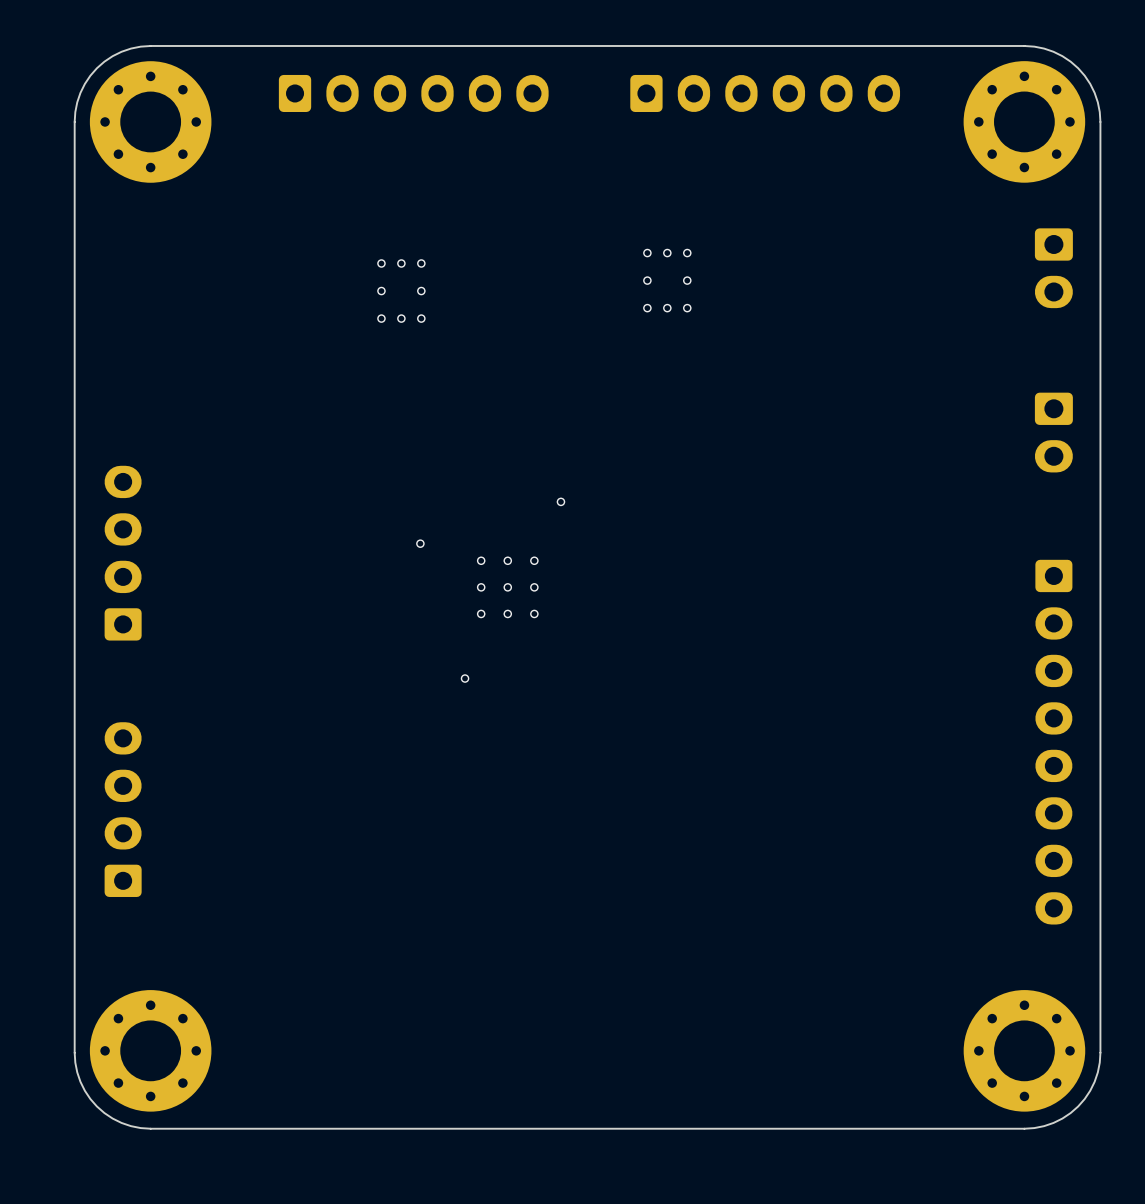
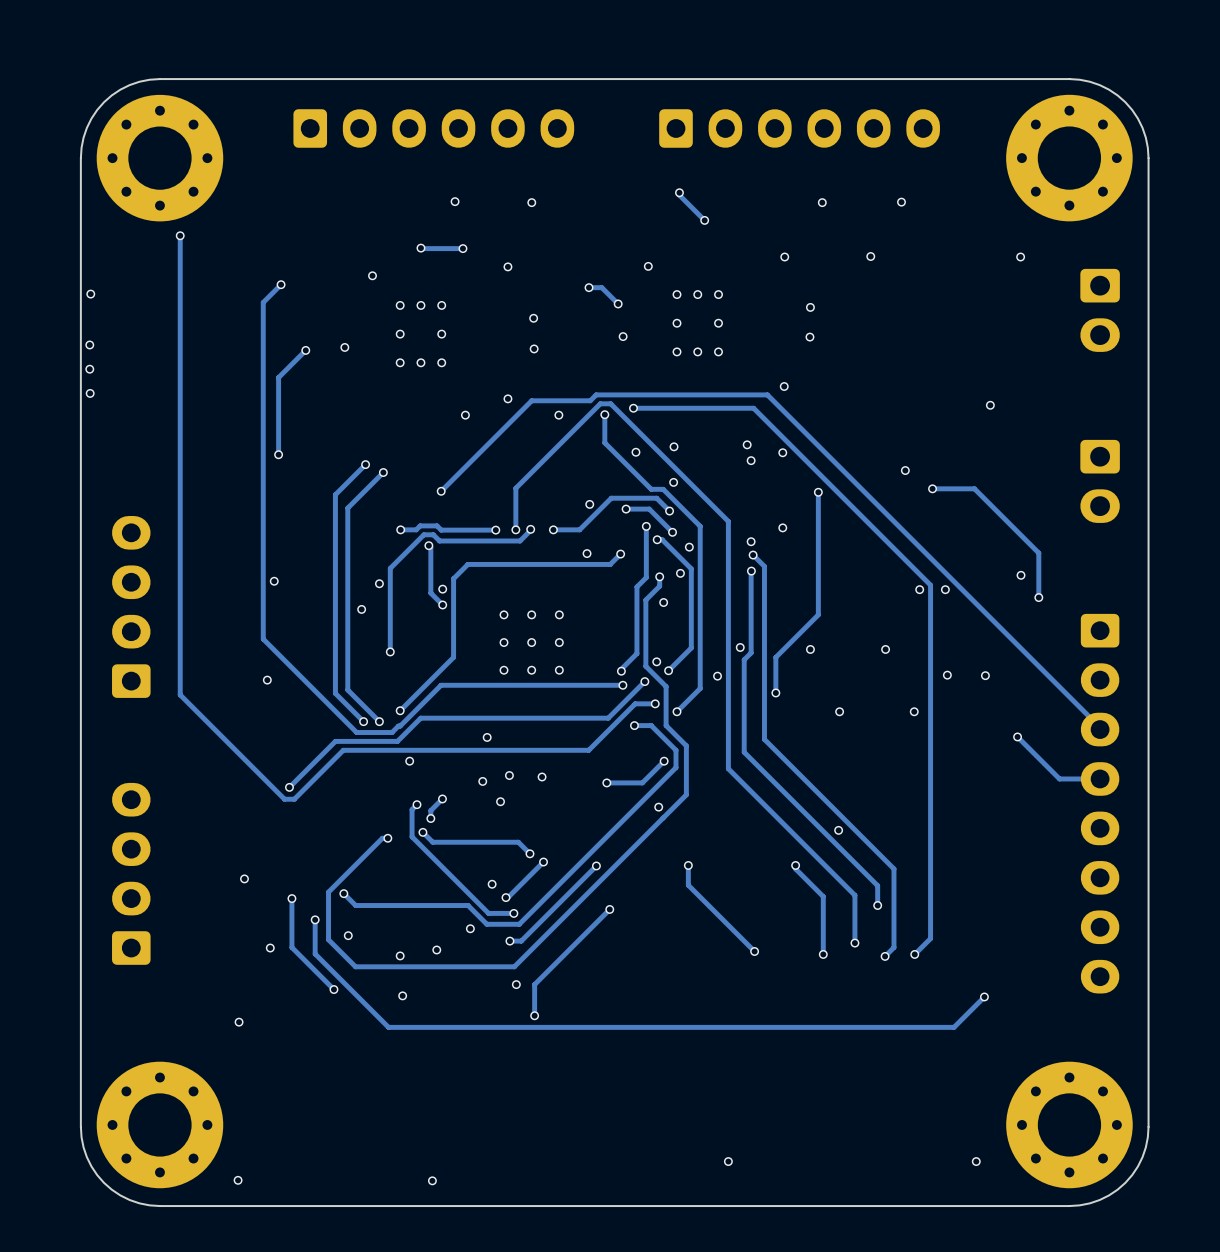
track: none -> (679, 192) (679, 195) (704, 220)
via: none -> (679, 192)
via: none -> (455, 201)
via: none -> (531, 202)
via: none -> (822, 202)
via: none -> (901, 202)
via: none -> (704, 220)
track: none -> (180, 235) (180, 694) (284, 799) (294, 799) (343, 750) (588, 750) (635, 703) (655, 703)
via: none -> (180, 235)
track: none -> (420, 248) (462, 248)
via: none -> (420, 248)
via: none -> (462, 248)
via: none -> (784, 257)
via: none -> (870, 256)
via: none -> (1020, 257)
via: none -> (648, 266)
via: none -> (507, 266)
via: none -> (372, 275)
track: none -> (281, 284) (263, 302) (263, 639) (356, 732) (392, 732) (441, 685) (622, 685)
via: none -> (281, 284)
track: none -> (589, 287) (601, 287) (618, 303)
via: none -> (589, 287)
via: none -> (90, 294)
via: none -> (618, 303)
via: none -> (810, 307)
via: none -> (533, 318)
via: none -> (623, 336)
via: none -> (809, 337)
via: none -> (89, 344)
via: none -> (344, 347)
via: none -> (534, 348)
track: none -> (305, 350) (278, 377) (278, 454)
via: none -> (305, 350)
via: none -> (89, 369)
via: none -> (784, 386)
via: none -> (90, 393)
via: none -> (507, 398)
via: none -> (990, 405)
track: none -> (633, 408) (753, 408) (930, 585) (930, 938) (914, 954)
via: none -> (633, 408)
via: none -> (465, 415)
via: none -> (558, 415)
track: none -> (604, 414) (604, 442) (651, 489) (663, 489) (700, 526) (700, 688) (676, 711)
via: none -> (604, 414)
via: none -> (747, 444)
via: none -> (674, 446)
via: none -> (635, 452)
via: none -> (782, 452)
via: none -> (278, 454)
via: none -> (751, 460)
track: none -> (365, 464) (335, 494) (335, 693) (363, 721)
via: none -> (365, 464)
via: none -> (905, 470)
track: none -> (383, 472) (347, 508) (347, 690) (379, 721)
via: none -> (383, 472)
via: none -> (673, 482)
track: none -> (932, 488) (974, 488) (1038, 553) (1038, 597)
via: none -> (932, 488)
track: none -> (441, 491) (531, 400) (590, 400) (596, 394) (767, 394) (1100, 729)
via: none -> (441, 491)
track: none -> (818, 492) (818, 614) (775, 657) (775, 692)
via: none -> (818, 492)
via: none -> (589, 504)
track: none -> (626, 509) (649, 509) (672, 532)
via: none -> (626, 509)
track: none -> (669, 511) (656, 498) (611, 498) (579, 529) (553, 529)
via: none -> (669, 511)
track: none -> (646, 526) (646, 577) (636, 586) (636, 653) (621, 671)
via: none -> (646, 526)
via: none -> (782, 527)
track: none -> (530, 529) (520, 540) (439, 540) (433, 534) (423, 534) (390, 568) (390, 651)
via: none -> (530, 529)
track: none -> (400, 529) (416, 529) (420, 525) (437, 525) (441, 530) (495, 530)
via: none -> (400, 529)
via: none -> (495, 530)
track: none -> (515, 529) (515, 488) (600, 403) (610, 403) (728, 521) (728, 768) (854, 895) (854, 943)
via: none -> (515, 529)
via: none -> (553, 529)
via: none -> (672, 532)
track: none -> (657, 539) (662, 539) (691, 568) (691, 647) (668, 670)
via: none -> (657, 539)
via: none -> (751, 541)
track: none -> (428, 545) (430, 547) (430, 593) (442, 604)
via: none -> (428, 545)
via: none -> (689, 547)
track: none -> (620, 554) (610, 564) (467, 564) (453, 578) (453, 657) (400, 710)
via: none -> (620, 554)
track: none -> (753, 555) (764, 566) (764, 739) (893, 868) (893, 947) (885, 956)
via: none -> (753, 555)
track: none -> (751, 571) (751, 652) (744, 659) (744, 752) (877, 885) (877, 905)
via: none -> (751, 571)
via: none -> (680, 573)
via: none -> (1021, 575)
track: none -> (659, 576) (659, 586) (645, 600) (645, 666) (666, 686) (666, 725) (686, 745) (686, 794) (514, 966) (355, 966) (328, 939) (328, 892) (382, 838) (387, 838)
via: none -> (659, 576)
via: none -> (274, 581)
via: none -> (379, 583)
via: none -> (442, 589)
via: none -> (919, 589)
via: none -> (945, 589)
via: (420, 543) -> none
via: none -> (1038, 597)
via: none -> (663, 602)
via: none -> (442, 604)
via: none -> (361, 609)
via: none -> (740, 647)
via: none -> (810, 649)
via: none -> (885, 649)
via: none -> (390, 651)
via: none -> (656, 661)
via: none -> (621, 671)
via: none -> (668, 670)
via: none -> (947, 675)
via: none -> (717, 676)
via: none -> (985, 675)
via: none -> (267, 680)
track: none -> (644, 681) (608, 718) (420, 718) (397, 741) (335, 741) (289, 787)
via: none -> (644, 681)
via: none -> (622, 685)
via: none -> (775, 692)
via: none -> (655, 703)
via: none -> (400, 710)
via: none -> (676, 711)
via: none -> (839, 711)
via: none -> (914, 711)
via: none -> (363, 721)
via: none -> (379, 721)
track: none -> (634, 725) (651, 725) (676, 750) (676, 767) (519, 924) (486, 924) (468, 905) (355, 905) (343, 893)
via: none -> (634, 725)
track: none -> (1017, 736) (1059, 778) (1100, 778)
via: none -> (1017, 736)
via: none -> (409, 761)
track: none -> (664, 761) (642, 782) (606, 782)
via: none -> (664, 761)
via: none -> (509, 775)
via: none -> (542, 776)
via: none -> (482, 781)
via: none -> (606, 782)
via: none -> (289, 787)
track: none -> (442, 798) (430, 810) (430, 818)
via: none -> (442, 798)
via: none -> (500, 801)
track: none -> (416, 804) (412, 809) (412, 836) (488, 913) (513, 913)
via: none -> (416, 804)
via: none -> (658, 807)
via: none -> (430, 818)
via: none -> (838, 830)
track: none -> (422, 832) (432, 842) (518, 842) (529, 853)
via: none -> (422, 832)
via: none -> (387, 838)
via: none -> (529, 853)
track: none -> (543, 862) (505, 897)
via: none -> (543, 862)
track: none -> (688, 865) (688, 885) (754, 951)
via: none -> (688, 865)
track: none -> (795, 865) (795, 868) (823, 896) (823, 954)
via: none -> (795, 865)
track: none -> (596, 865) (521, 941) (509, 941)
via: none -> (596, 865)
via: none -> (244, 878)
via: none -> (492, 884)
via: none -> (343, 893)
via: none -> (505, 897)
track: none -> (291, 898) (291, 947) (333, 989)
via: none -> (291, 898)
via: none -> (877, 905)
track: none -> (609, 909) (534, 984) (534, 1015)
via: none -> (609, 909)
via: none -> (513, 913)
track: none -> (315, 919) (315, 953) (388, 1027) (954, 1027) (984, 996)
via: none -> (315, 919)
via: none -> (470, 928)
via: none -> (348, 935)
via: none -> (509, 941)
via: none -> (854, 943)
via: none -> (270, 948)
via: none -> (436, 950)
via: none -> (754, 951)
via: none -> (823, 954)
via: none -> (914, 954)
via: none -> (400, 955)
via: none -> (885, 956)
via: none -> (516, 984)
via: none -> (333, 989)
via: none -> (402, 995)
via: none -> (984, 996)
via: none -> (534, 1015)
via: none -> (239, 1022)
via: none -> (728, 1161)
via: none -> (976, 1161)
via: none -> (238, 1180)
via: none -> (432, 1180)

